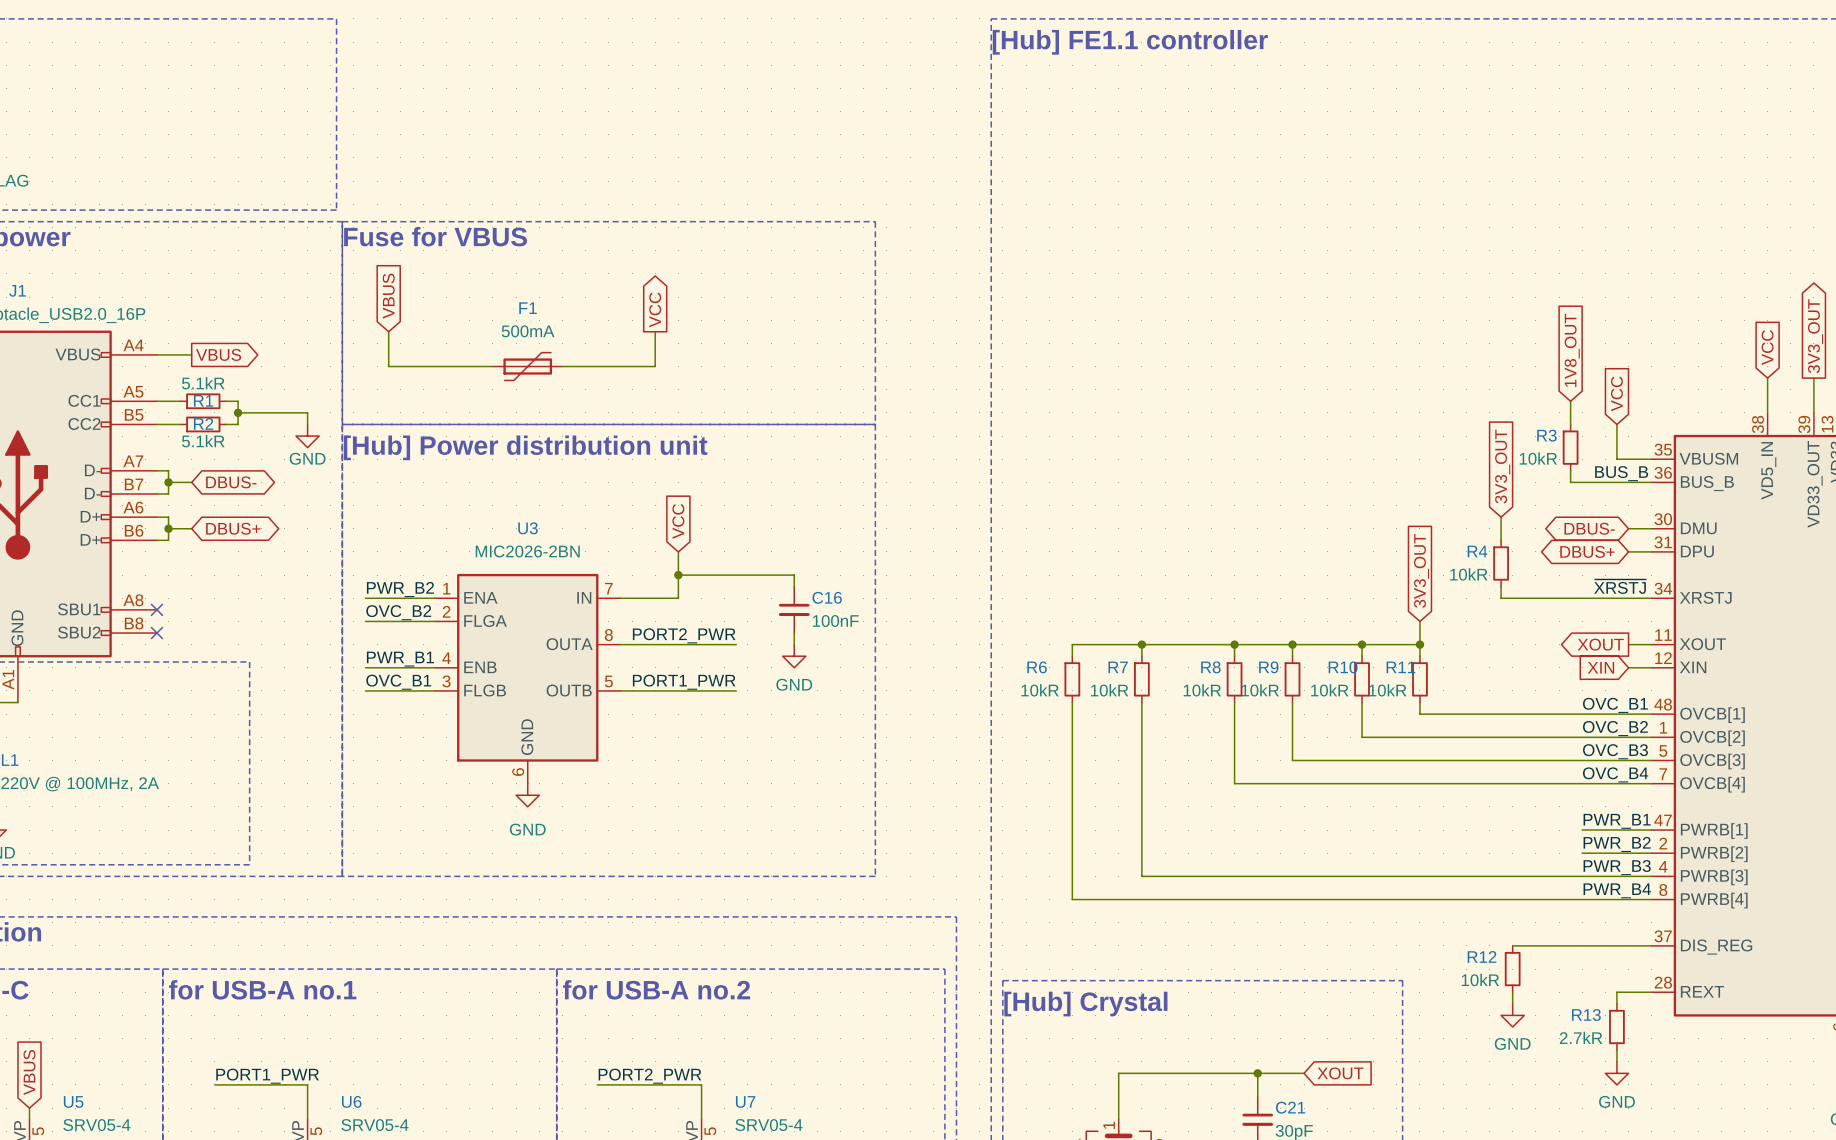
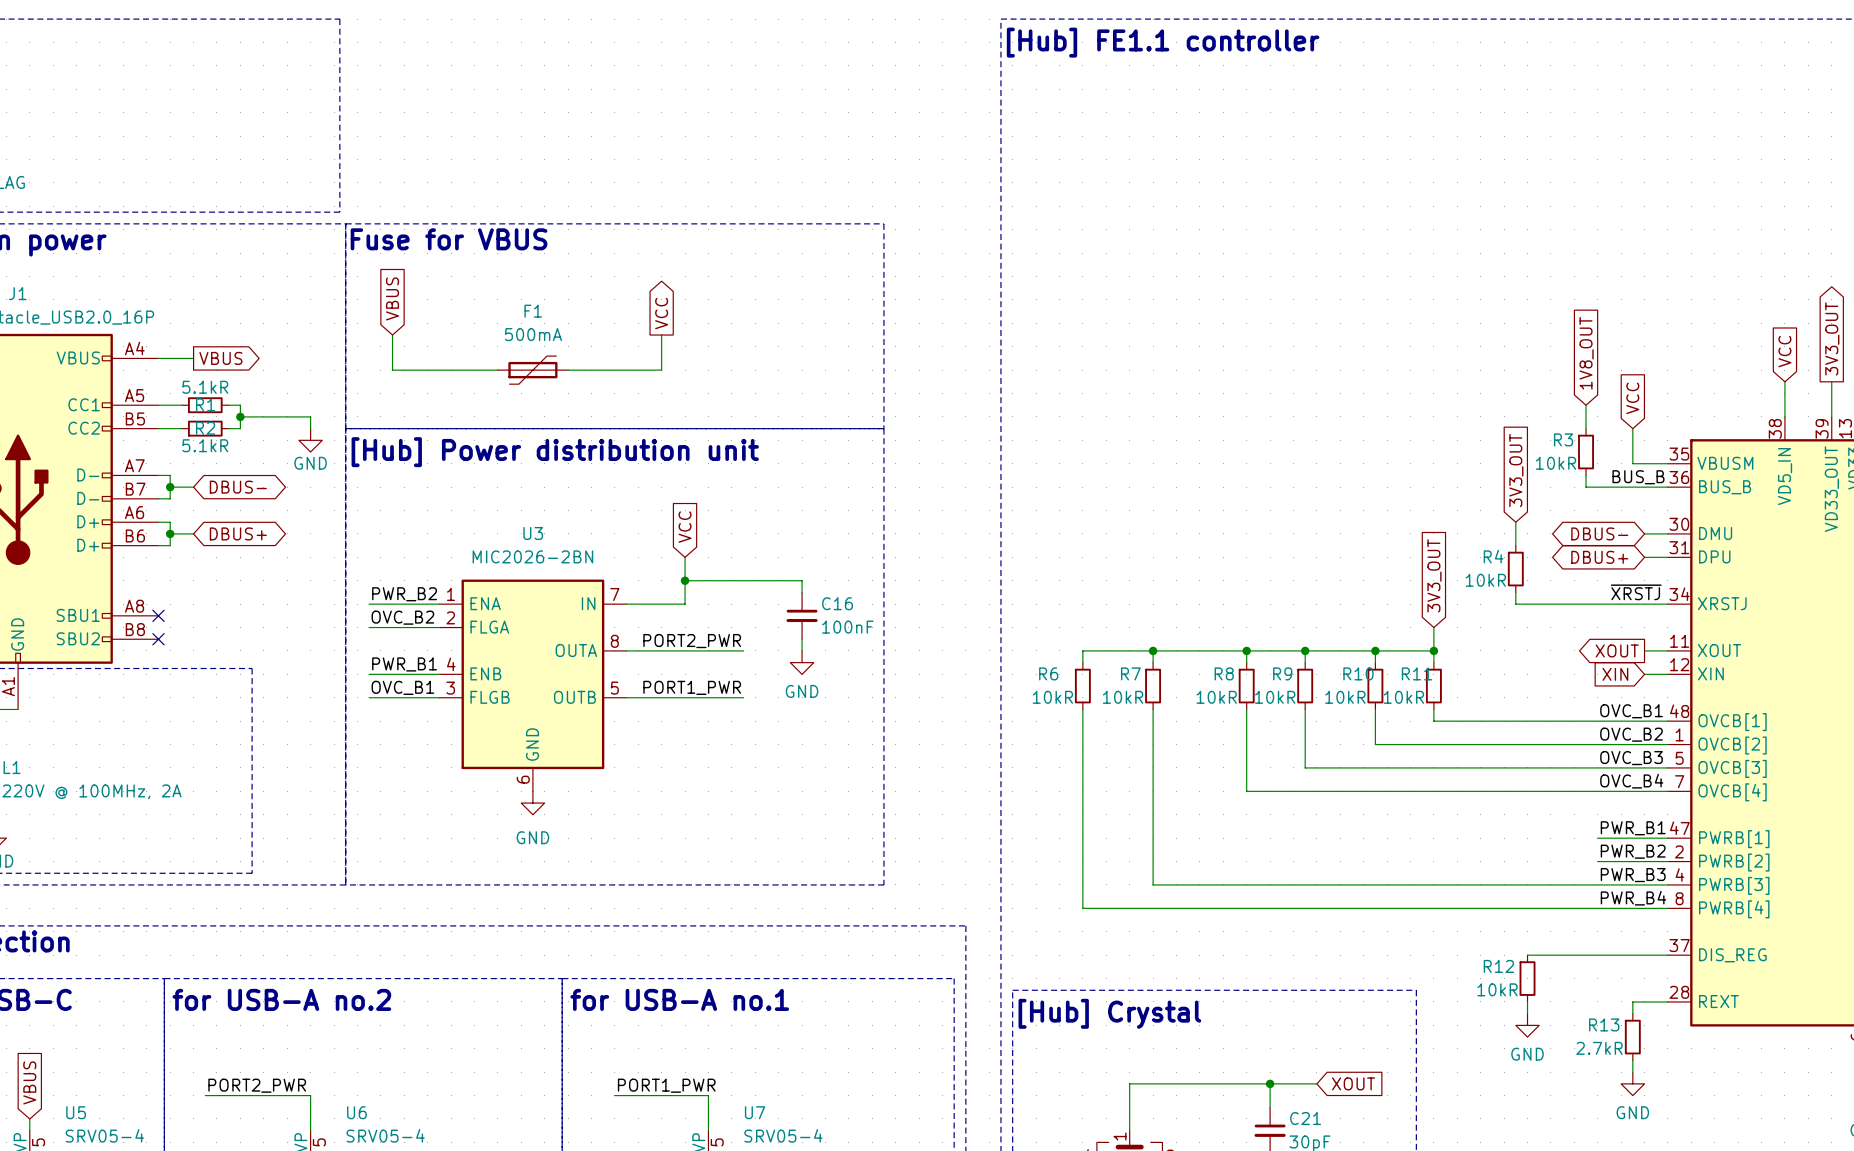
text: for USB-A no.1 (262, 989) -> for USB-A no.2 (281, 999)
text: for USB-A no.2 (656, 989) -> for USB-A no.1 (679, 999)
label: PORT1_PWR (267, 1076) -> PORT2_PWR (257, 1085)
label: PORT2_PWR (649, 1076) -> PORT1_PWR (666, 1085)
wire: none -> (205, 1095) (216, 1095)
wire: (597, 1084) (608, 1084) -> none

